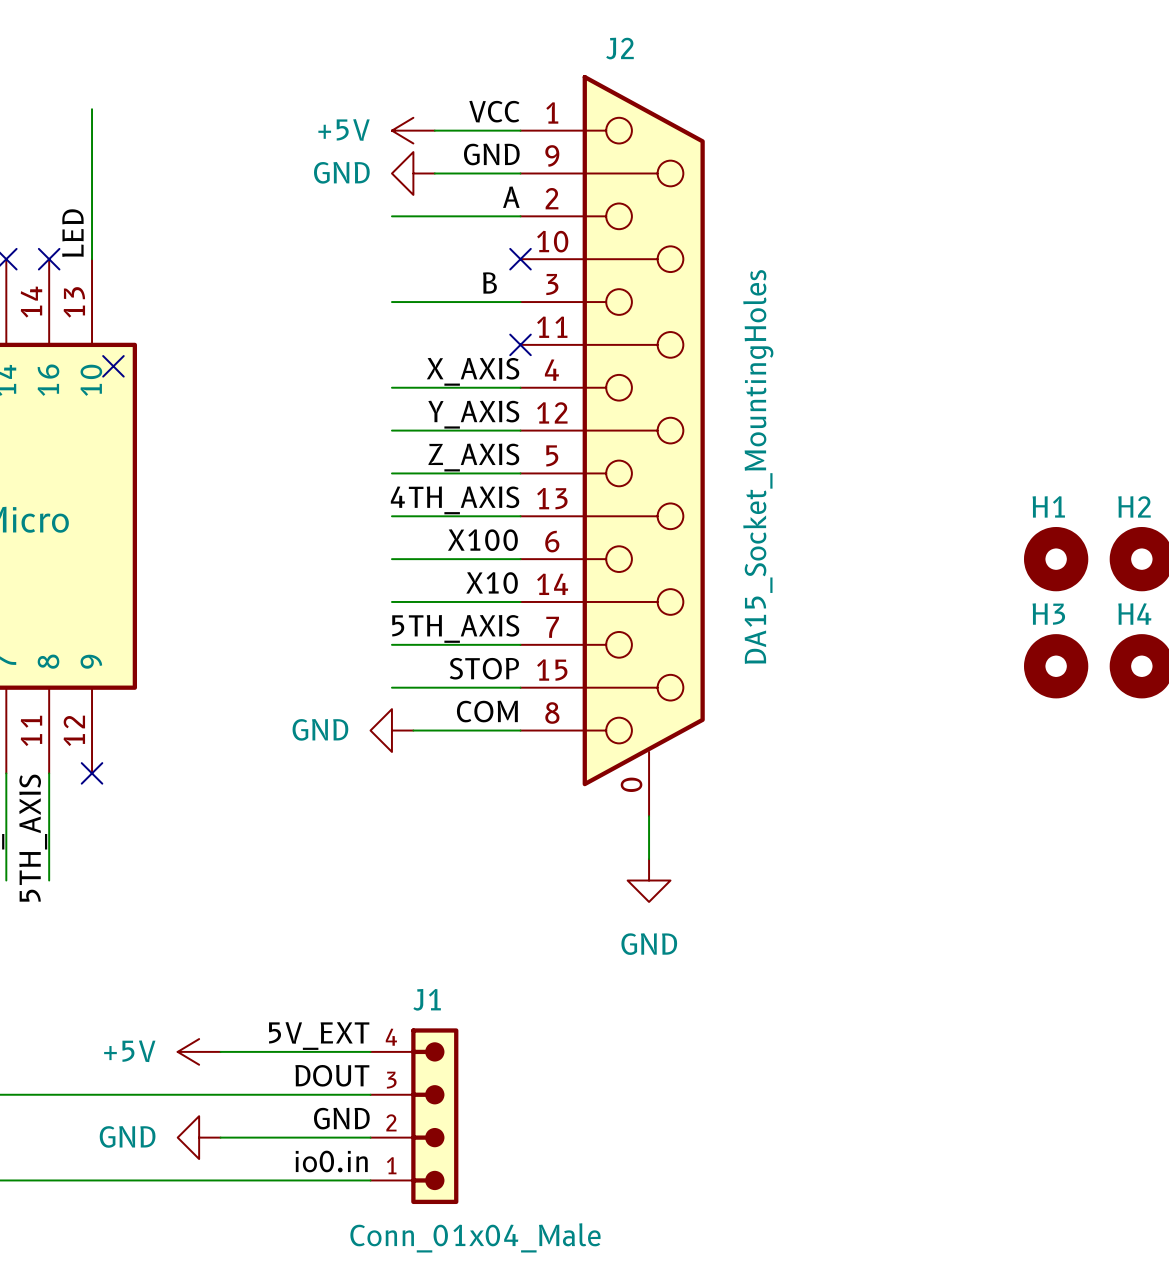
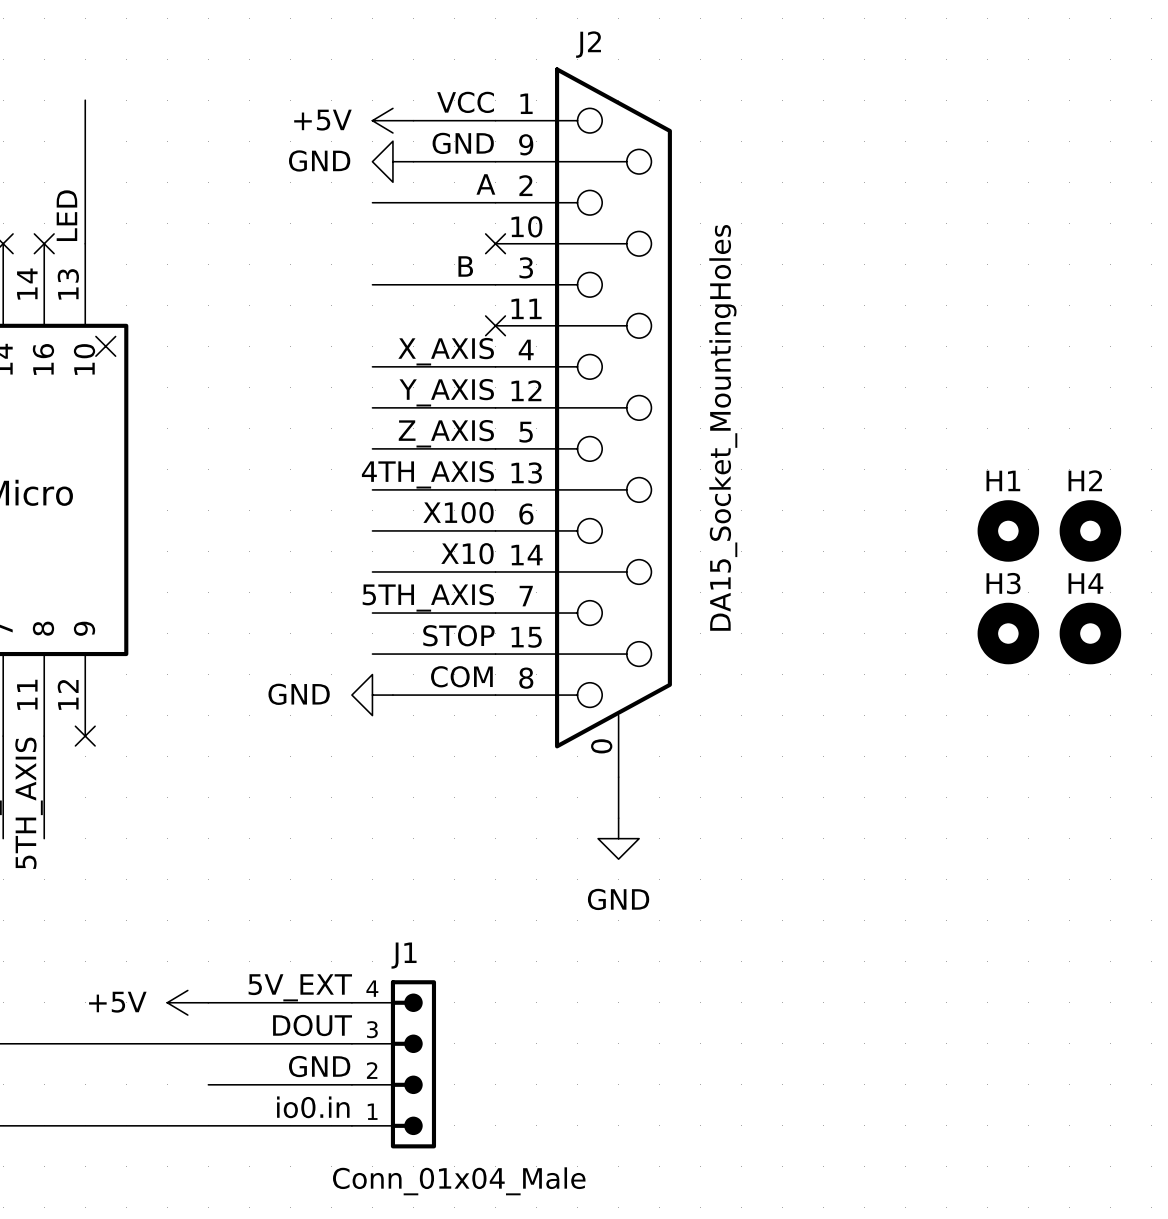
power symbol: GND (199, 1137) -> none

